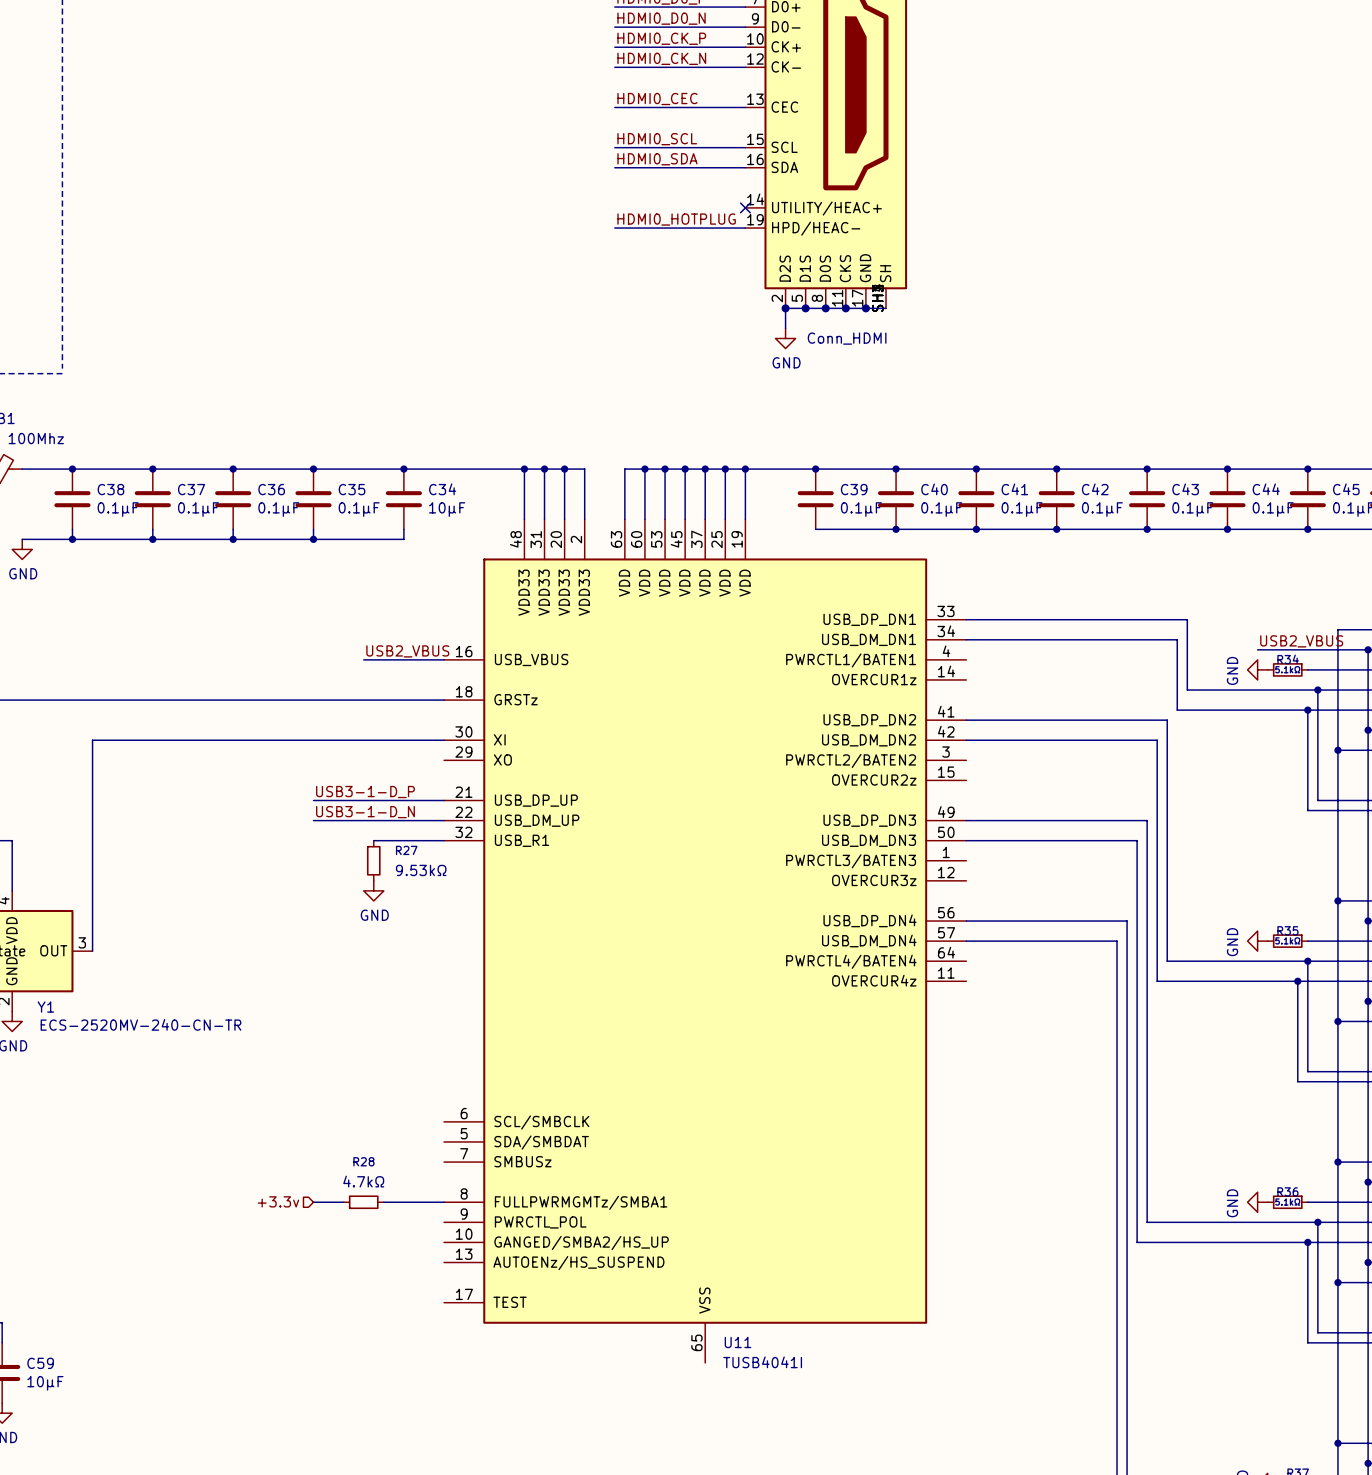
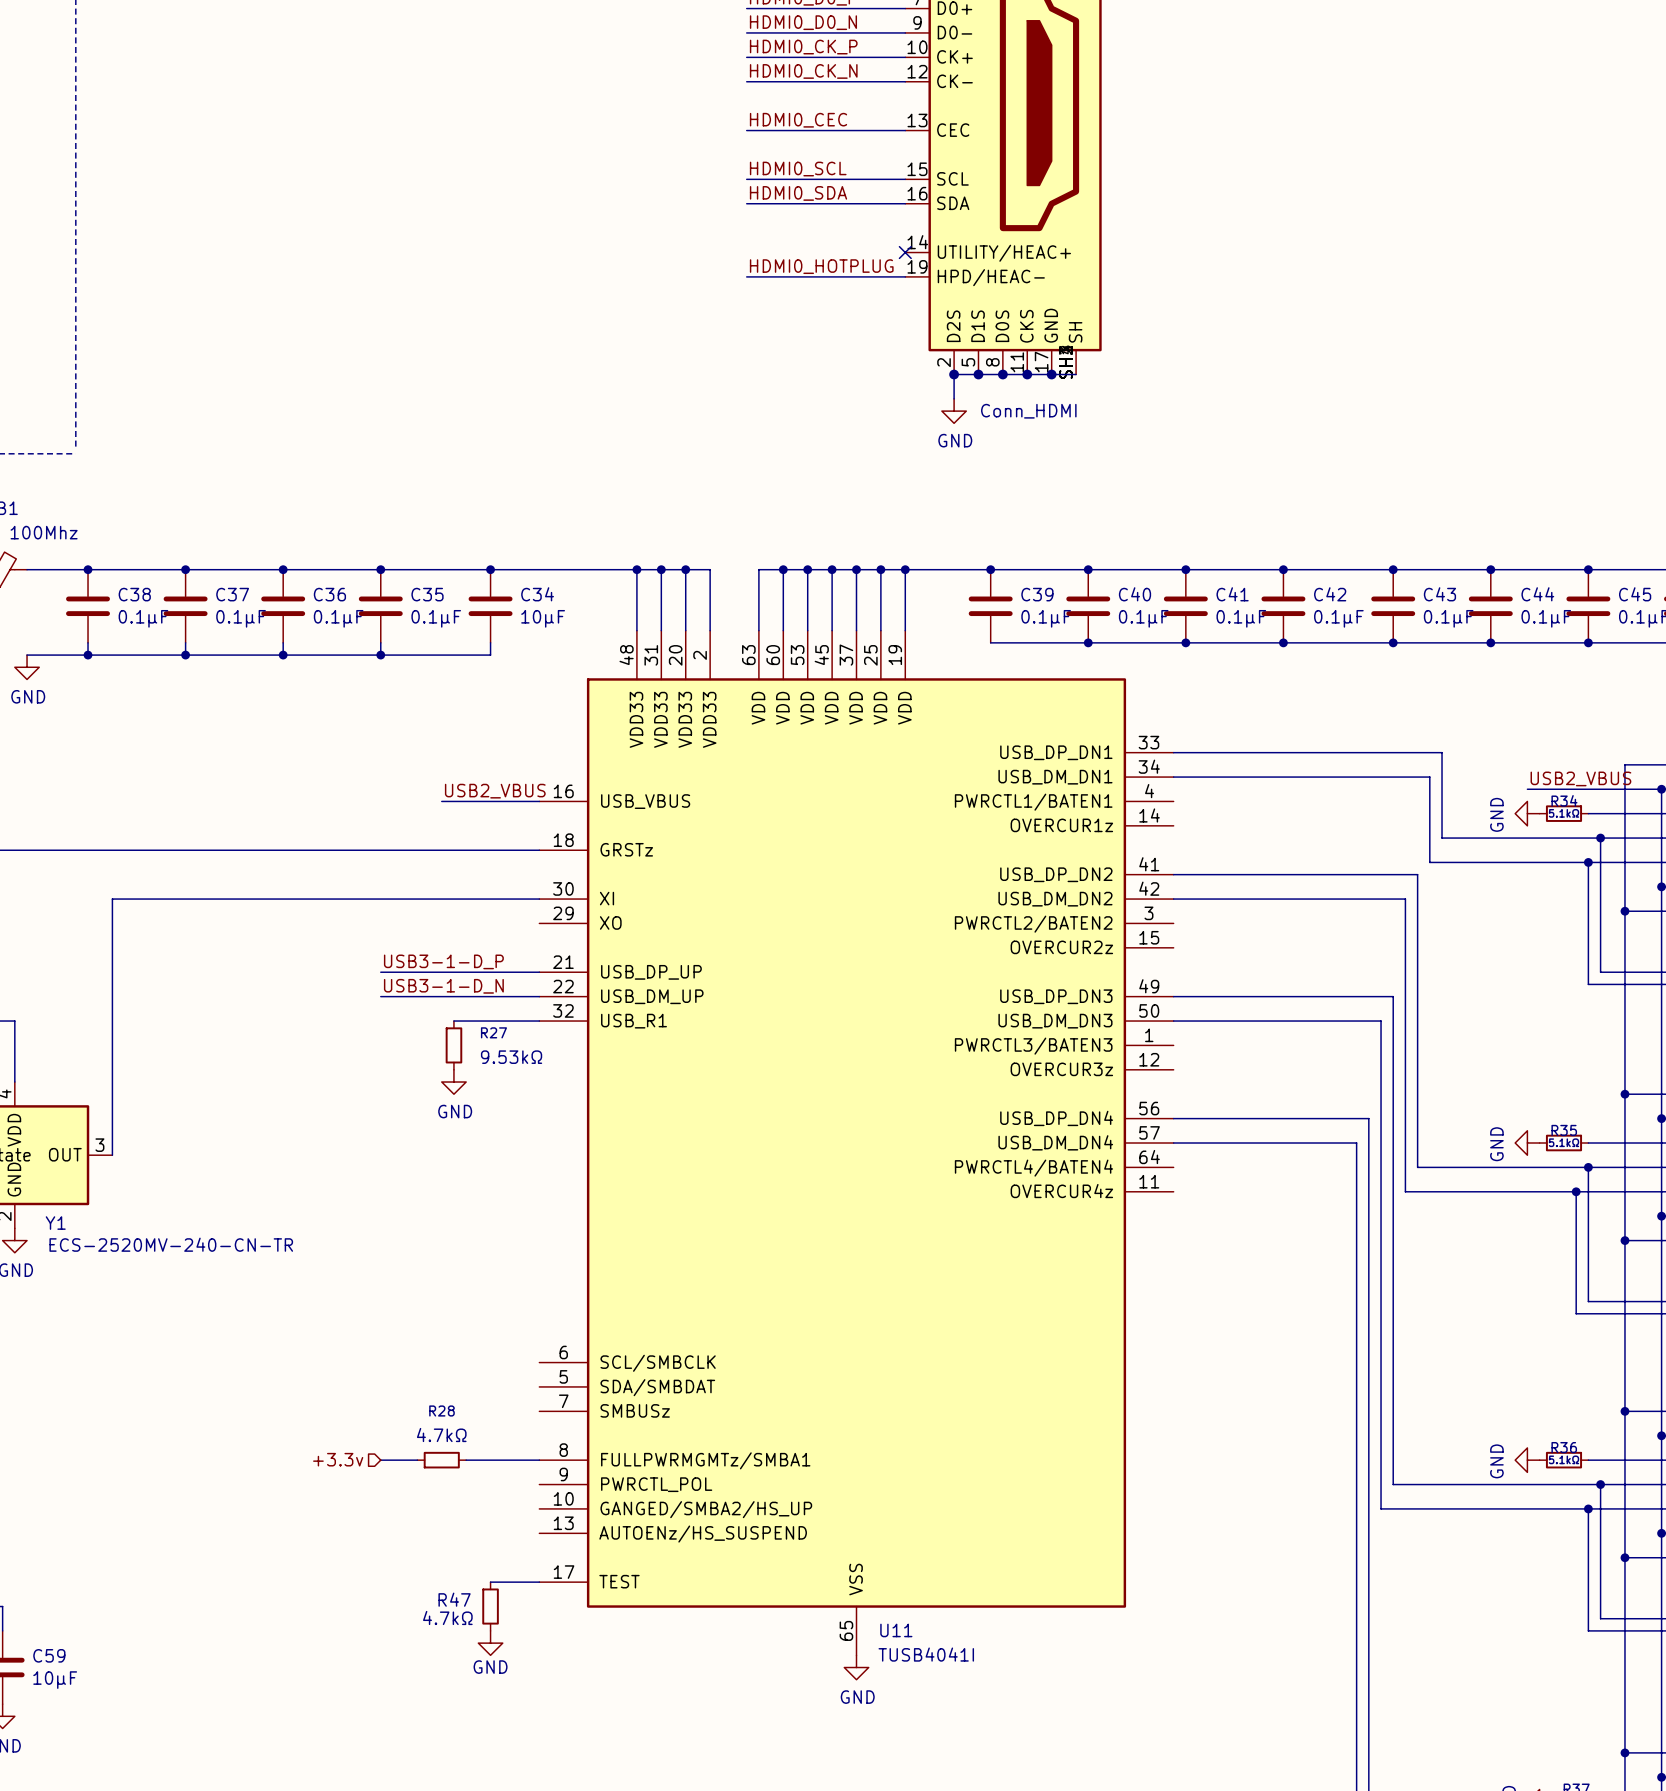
wire: none -> (490, 1582) (539, 1582)
R47: none -> 4.7kΩ (490, 1606)
power symbol: none -> GND (490, 1643)
power symbol: none -> GND (856, 1667)

